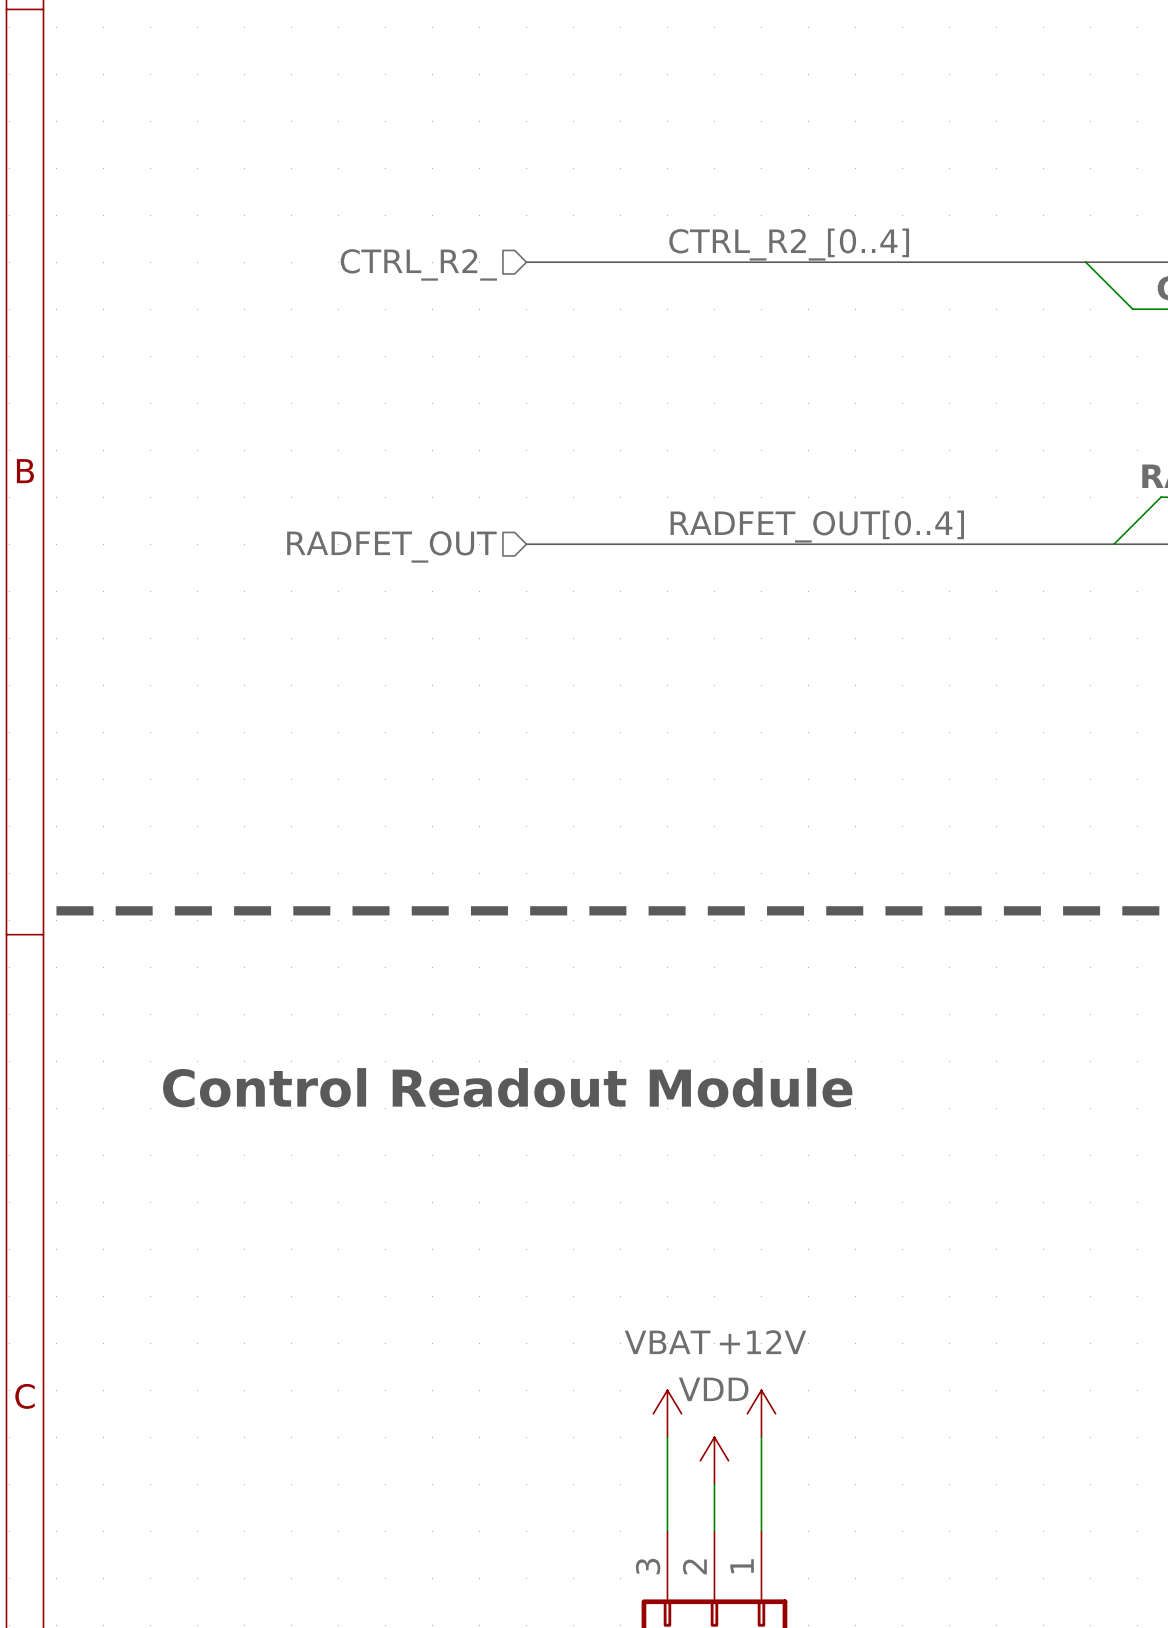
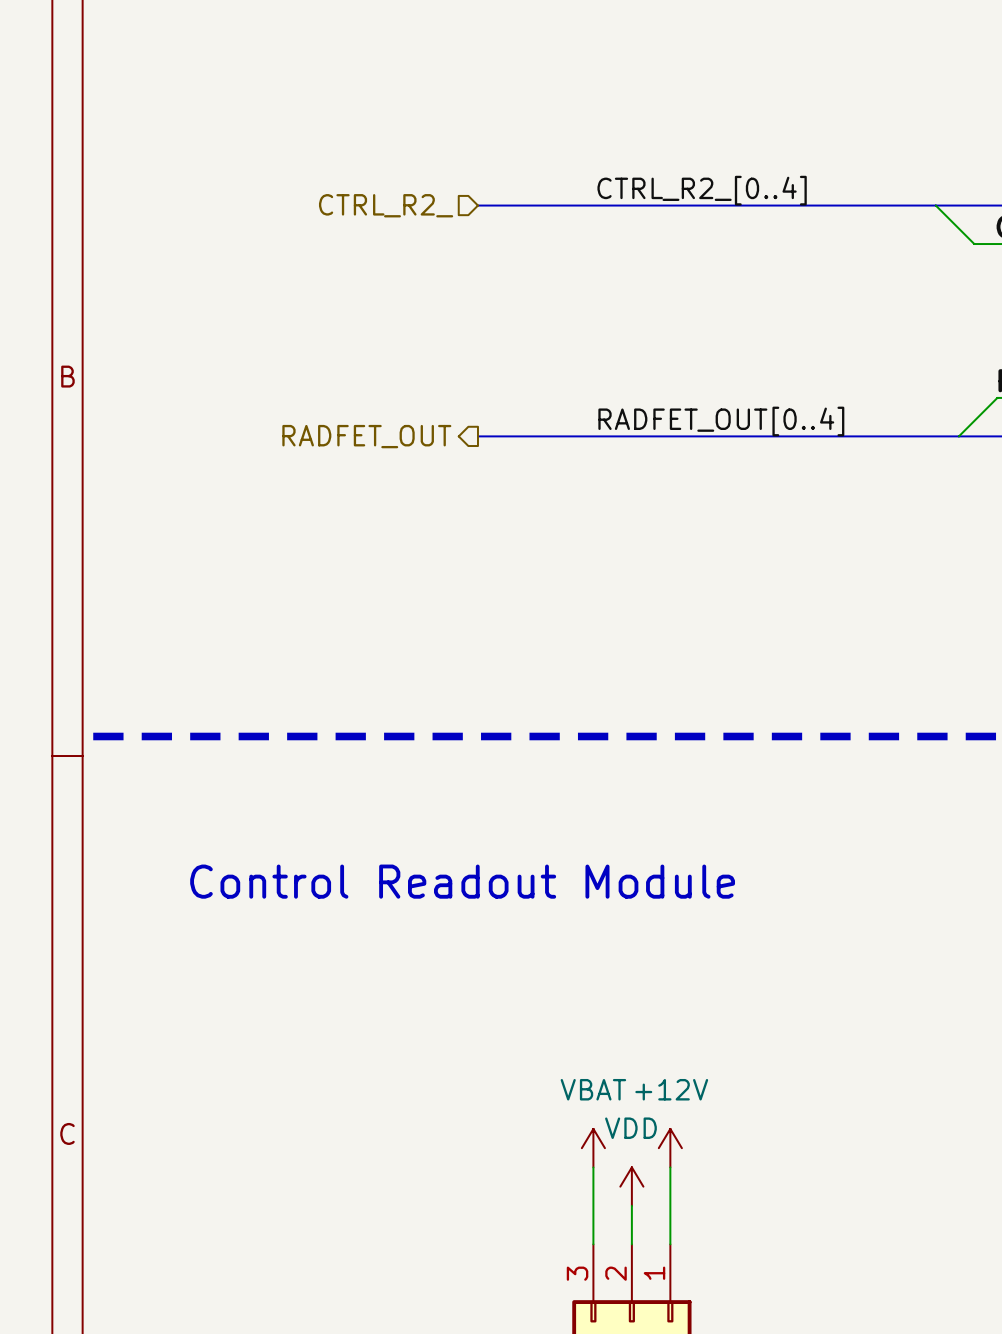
hierarchical label shape: input (391, 546) -> output (366, 436)

